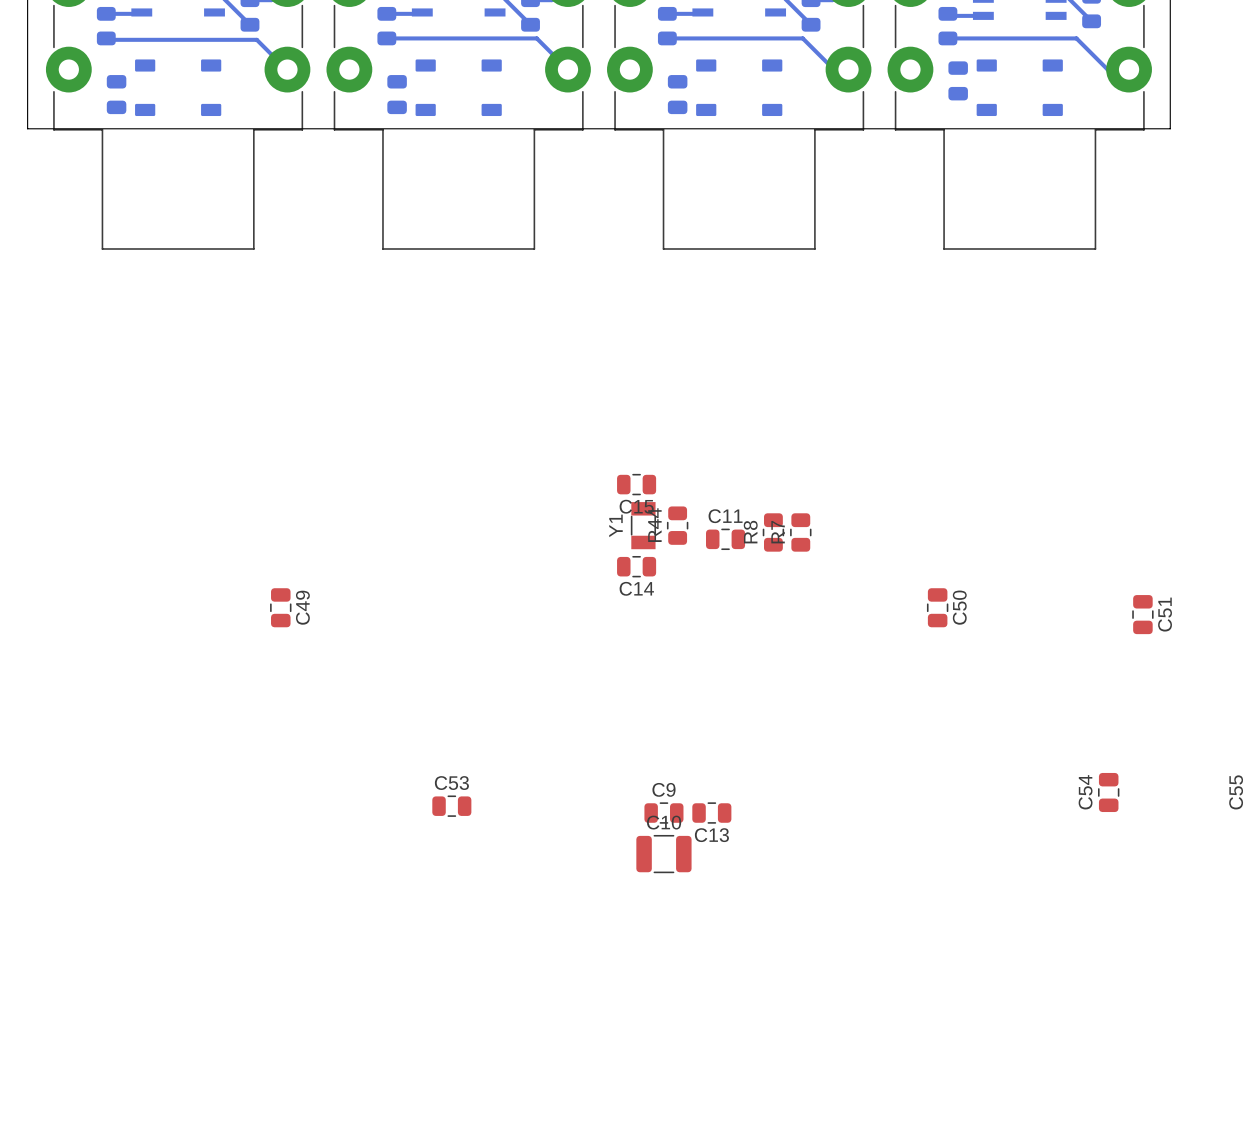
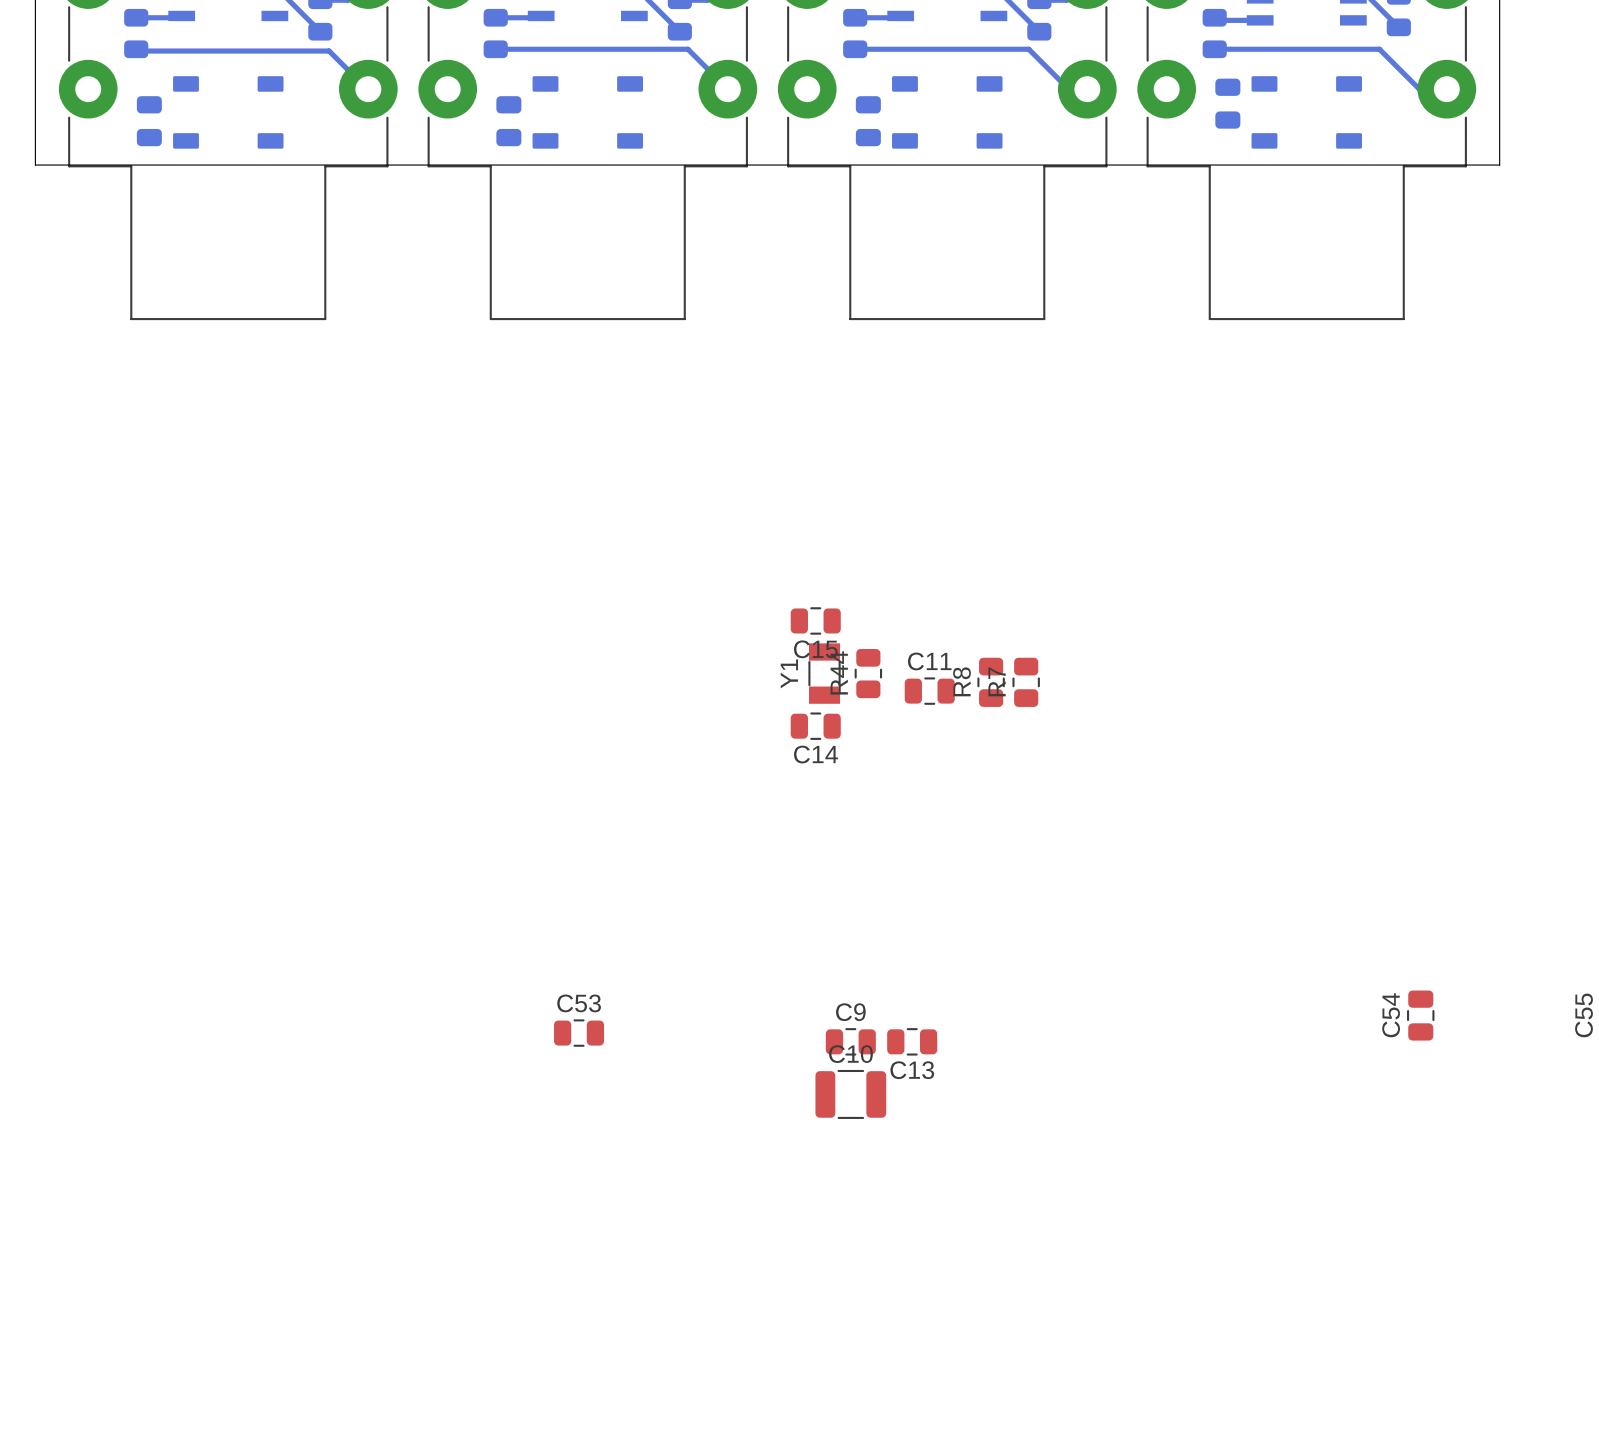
C49: (280, 607) -> none
C50: (937, 607) -> none
C51: (1142, 614) -> none

